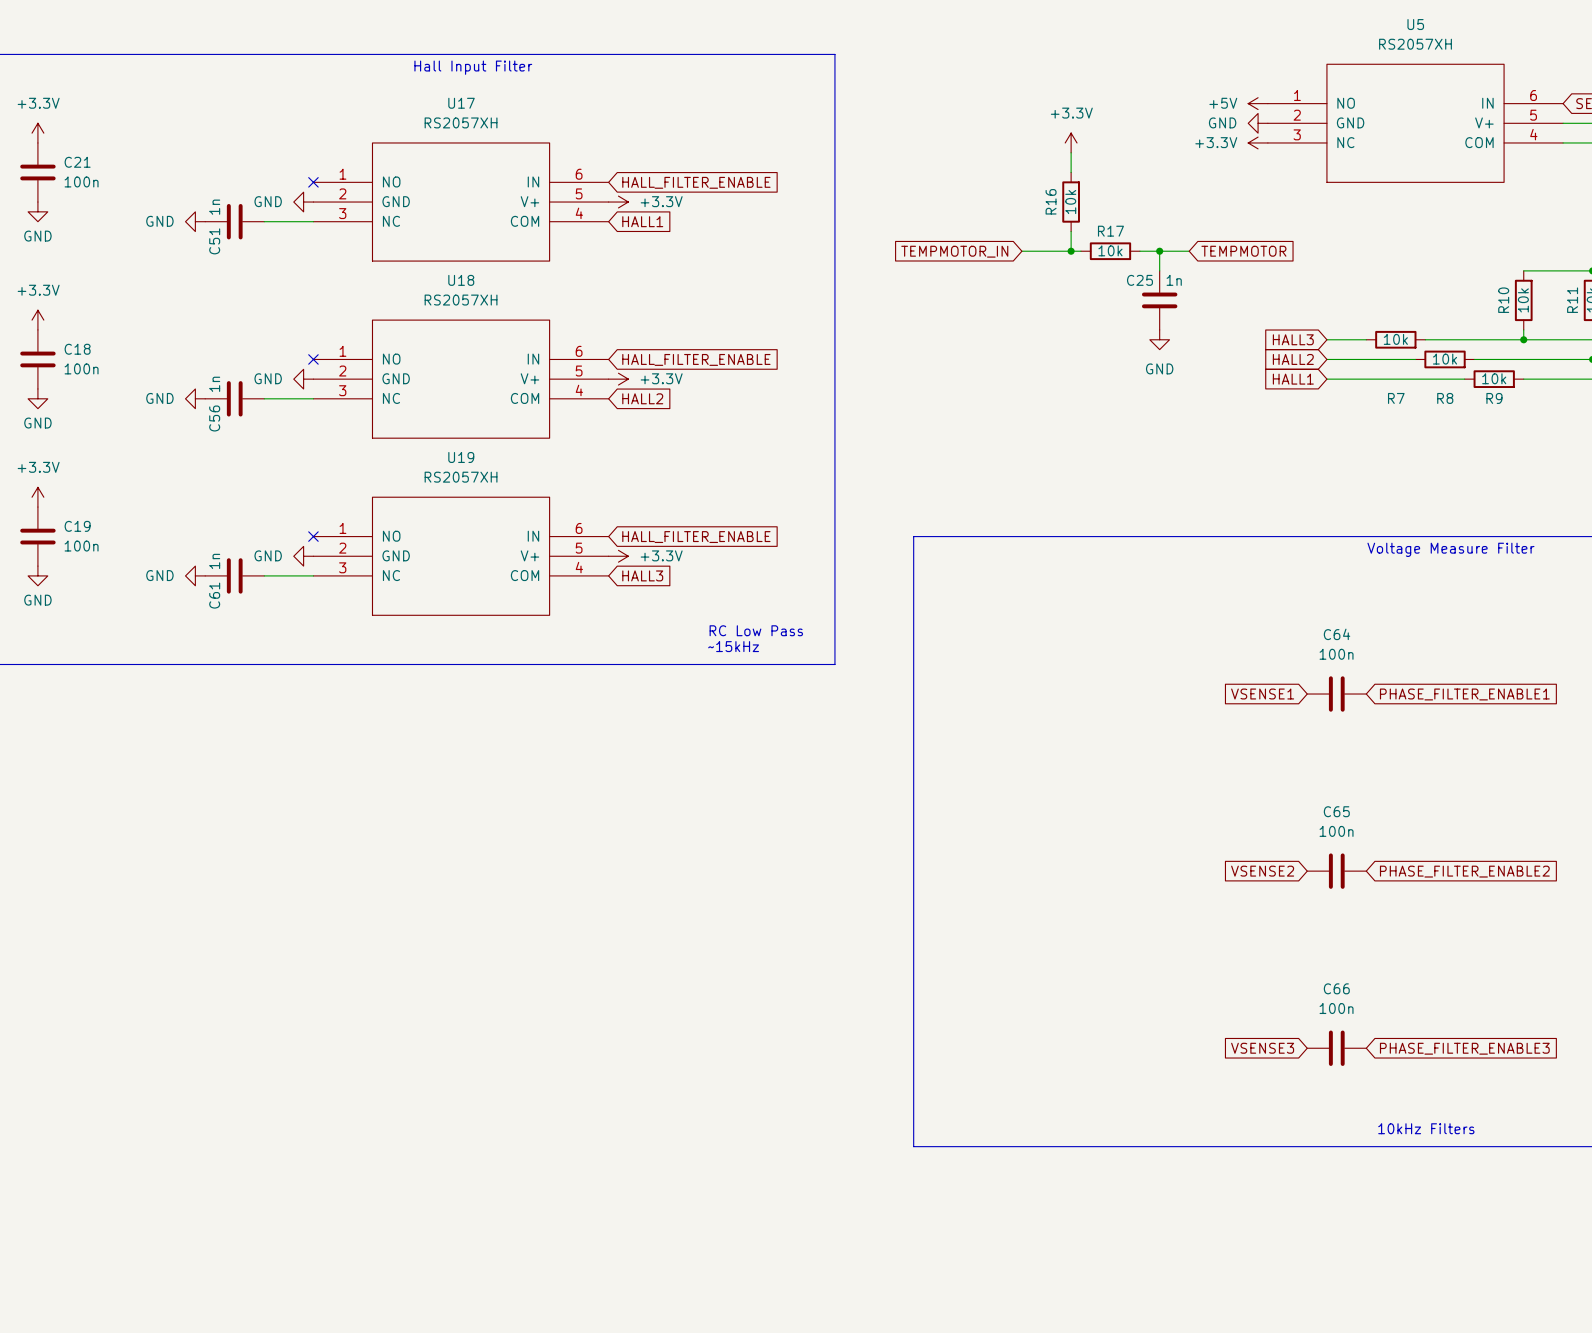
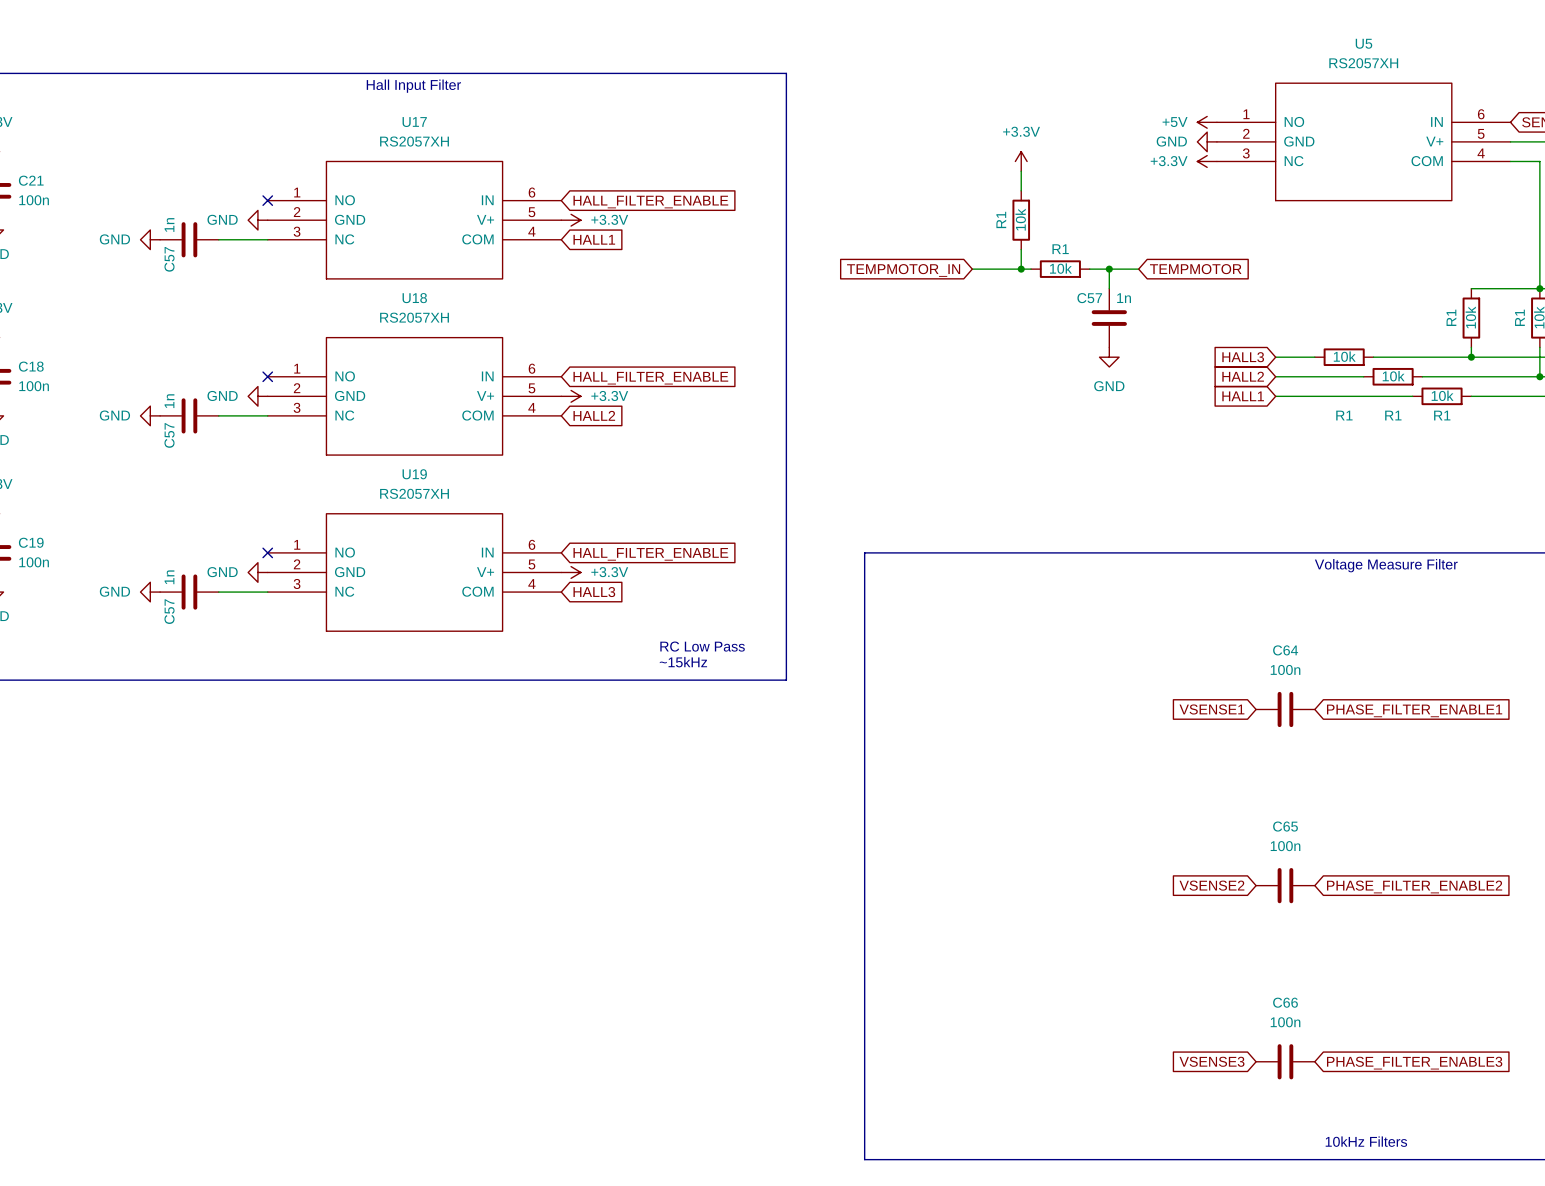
R16 name: R16 (1051, 201) -> R1 (1001, 219)
R17 name: R17 (1110, 231) -> R1 (1060, 249)
C51 name: C51 (214, 241) -> C57 (169, 259)
C25 name: C25 (1139, 280) -> C57 (1089, 298)
R10 name: R10 (1503, 300) -> R1 (1451, 317)
R11 name: R11 (1572, 300) -> R1 (1519, 317)
R7 name: R7 (1396, 398) -> R1 (1344, 415)
R8 name: R8 (1445, 398) -> R1 (1393, 415)
R9 name: R9 (1494, 398) -> R1 (1442, 415)
C56 name: C56 (214, 418) -> C57 (169, 435)
C61 name: C61 (214, 595) -> C57 (169, 611)

